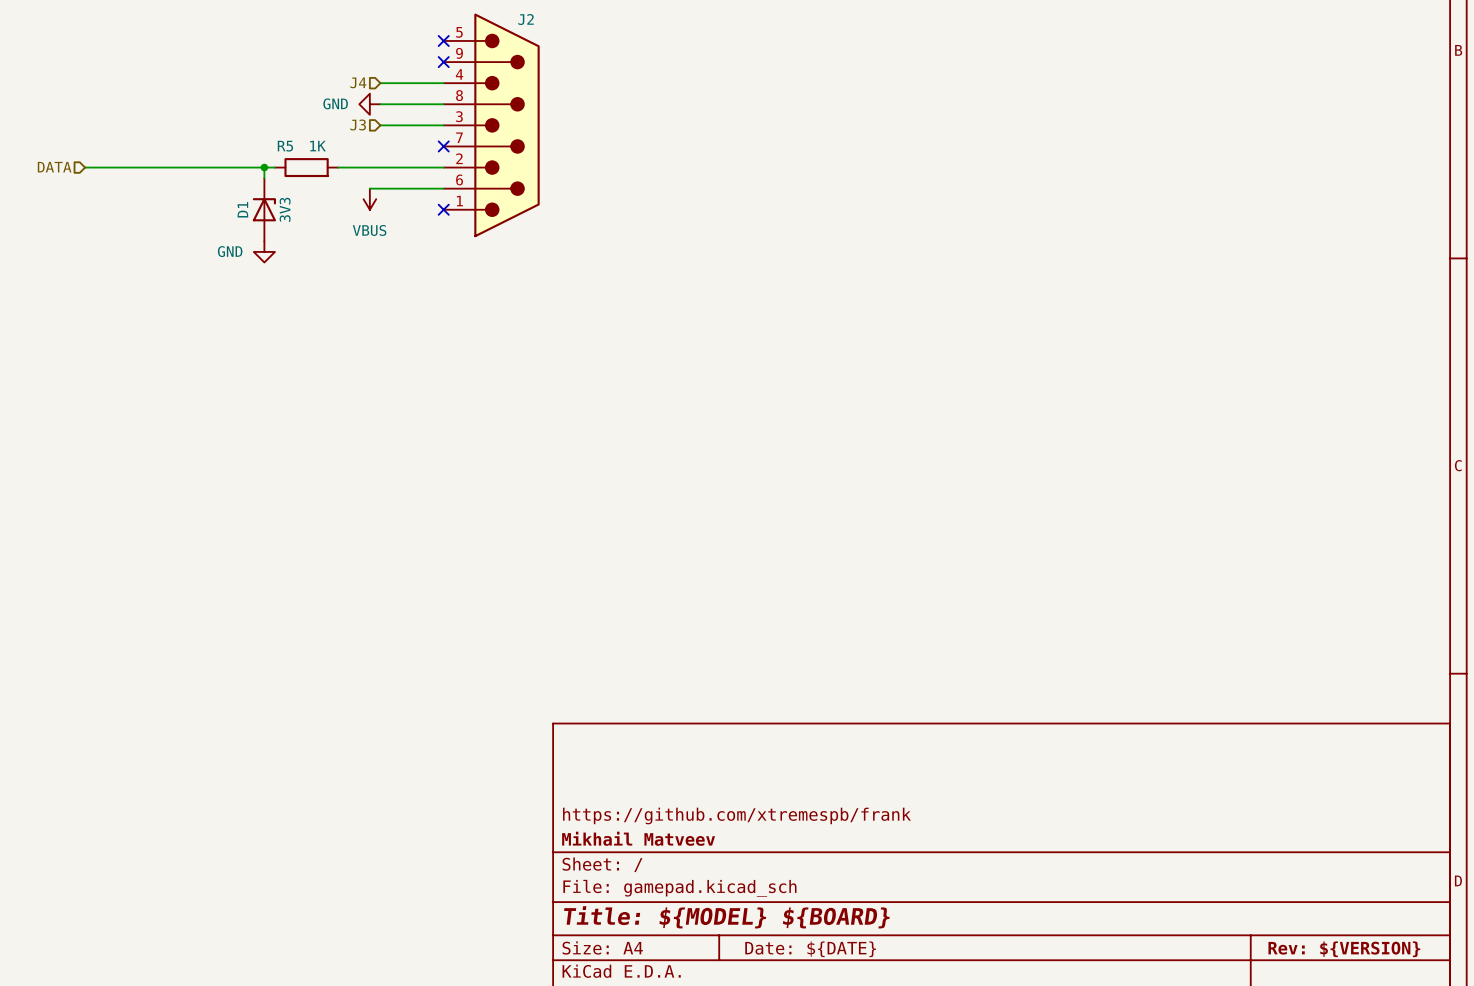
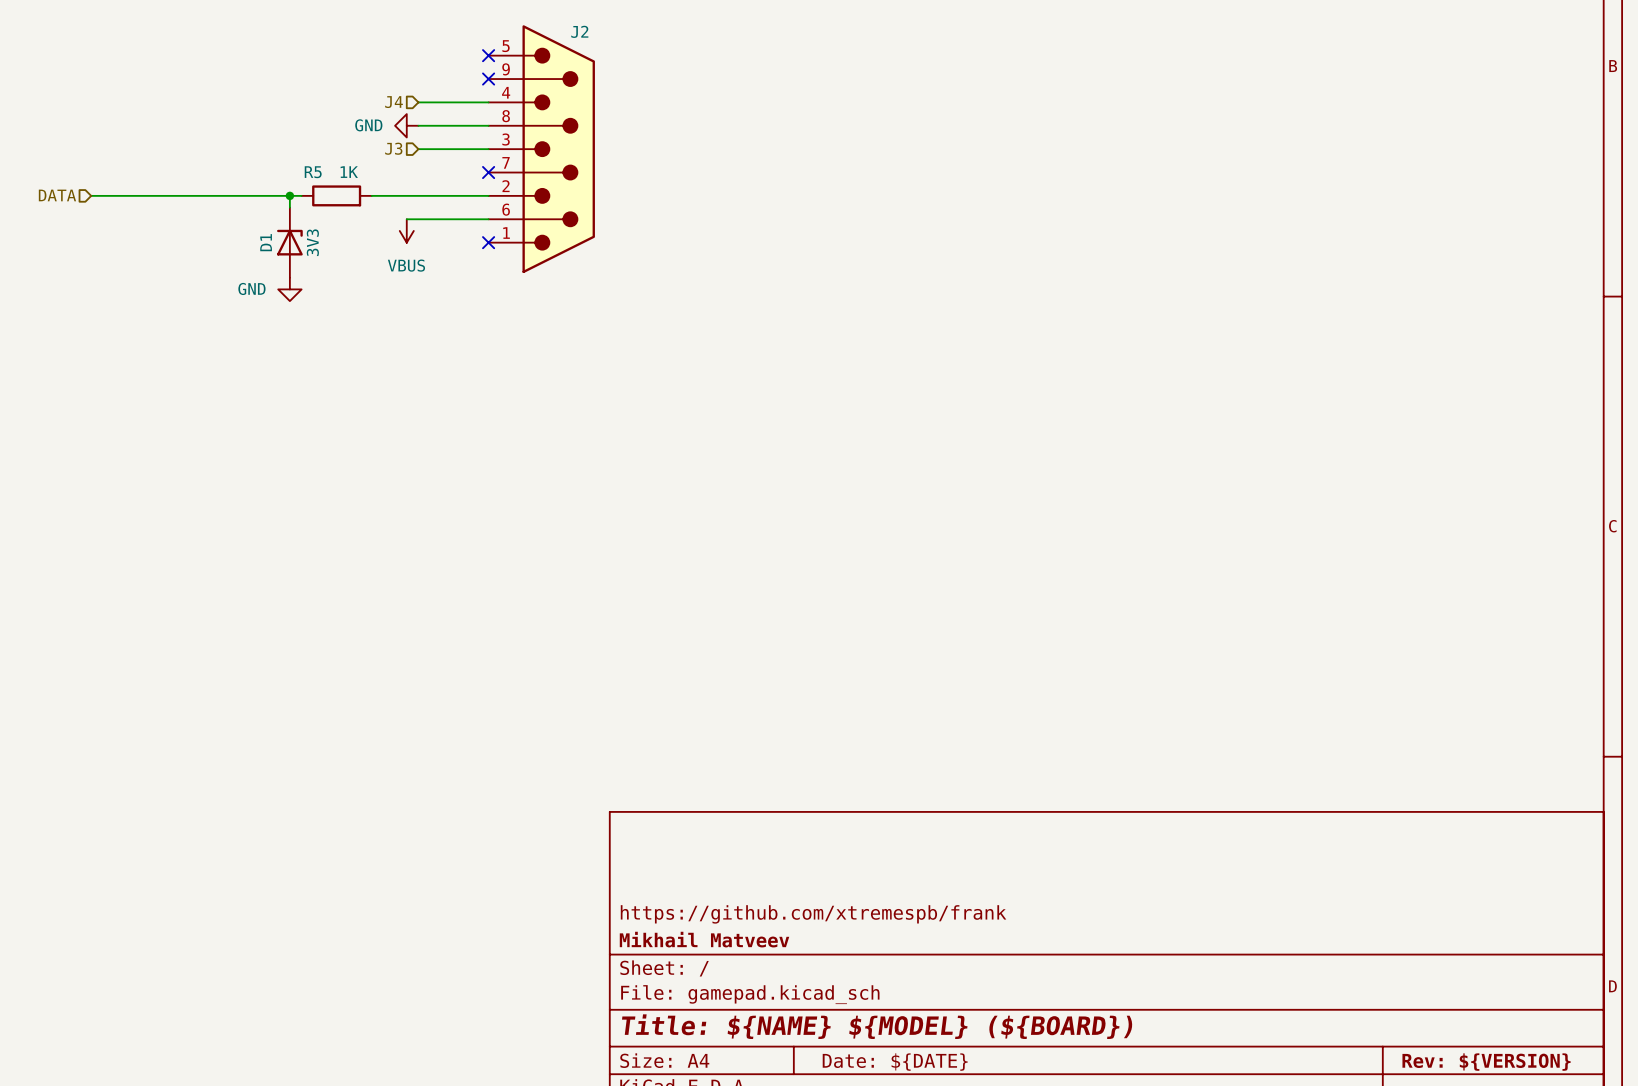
title block: Title: ${MODEL} ${BOARD} (726, 917) -> Title: ${NAME} ${MODEL} (${BOARD}) (877, 1026)

